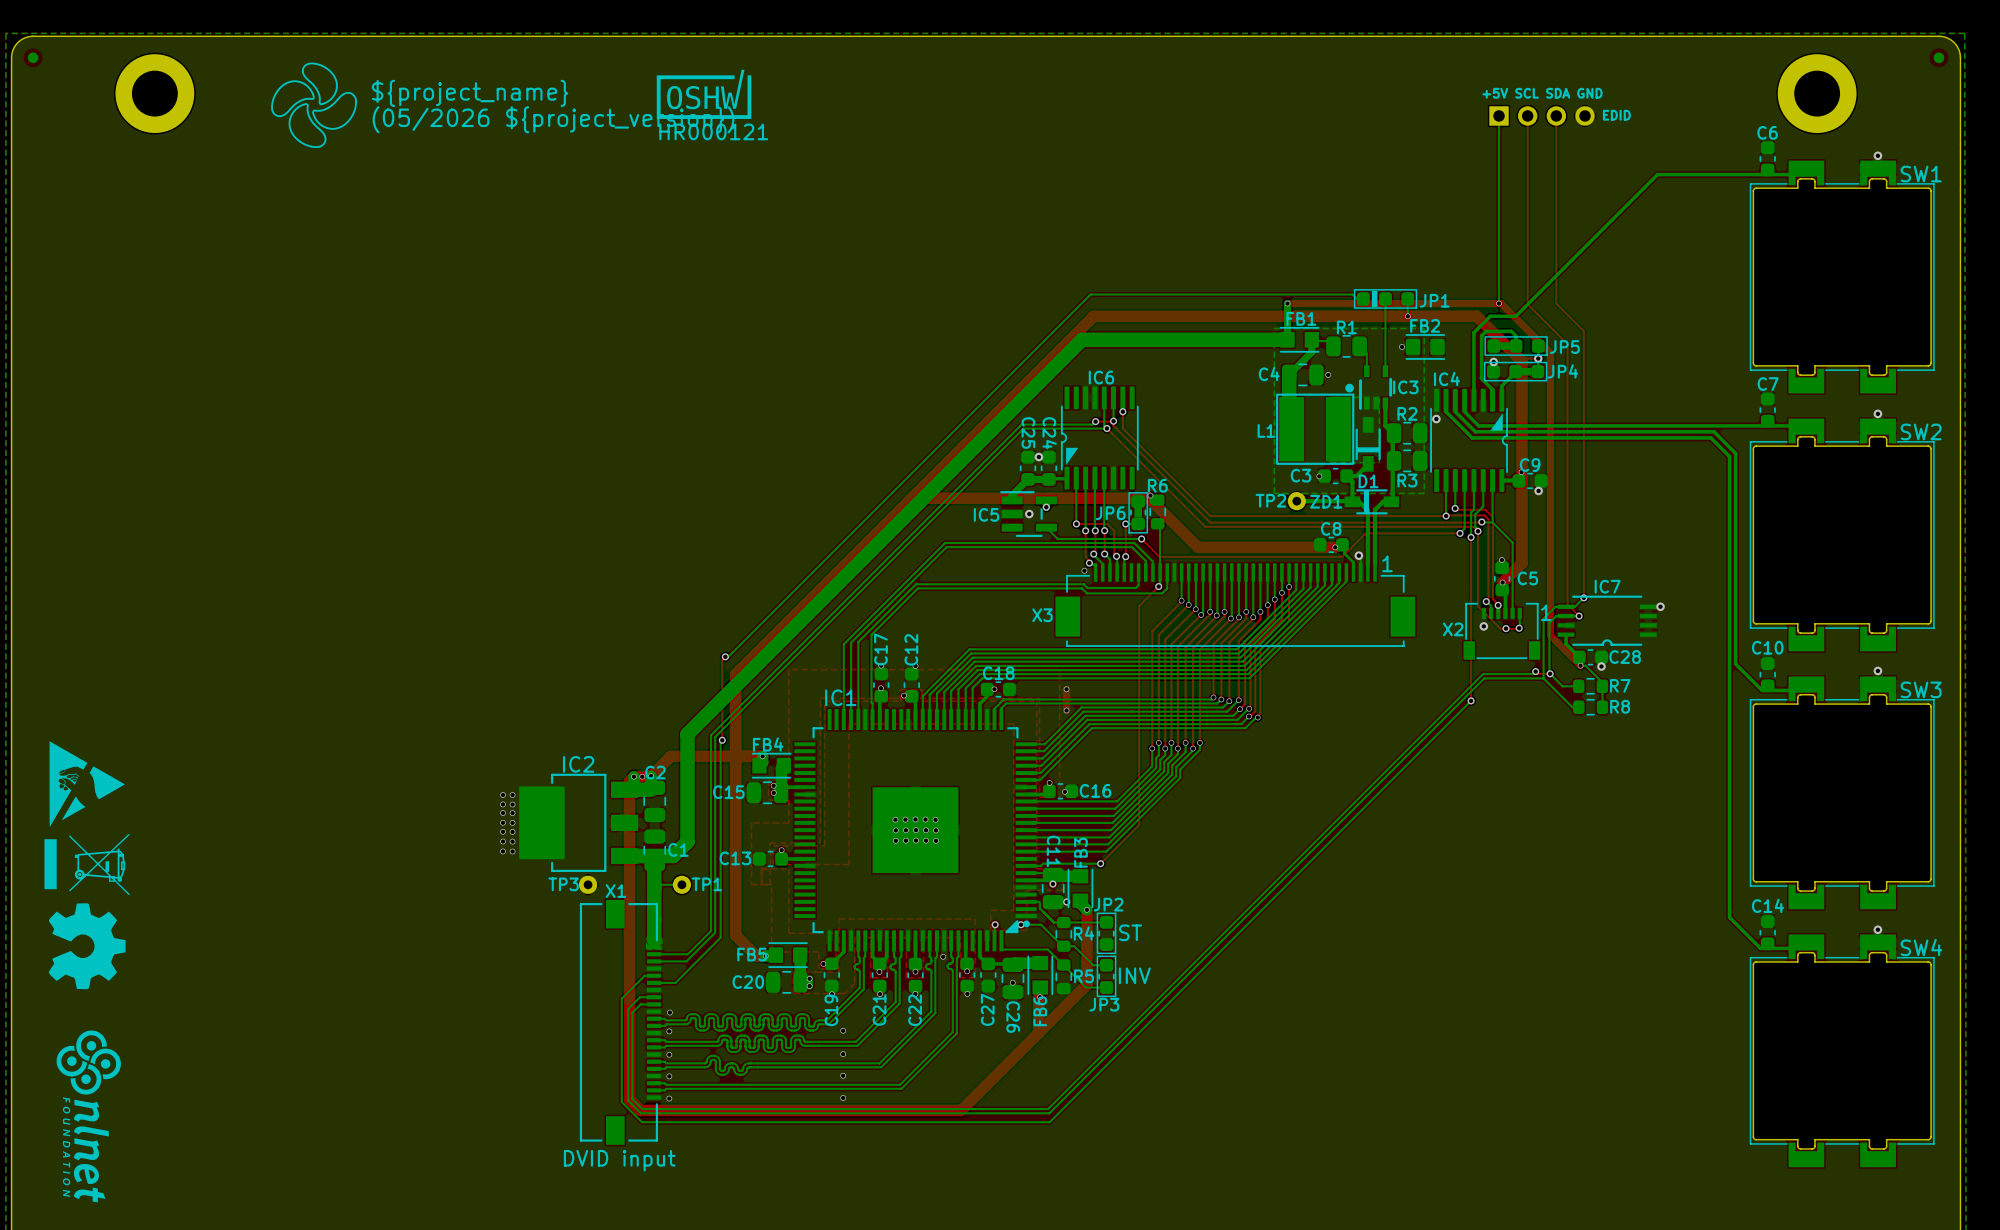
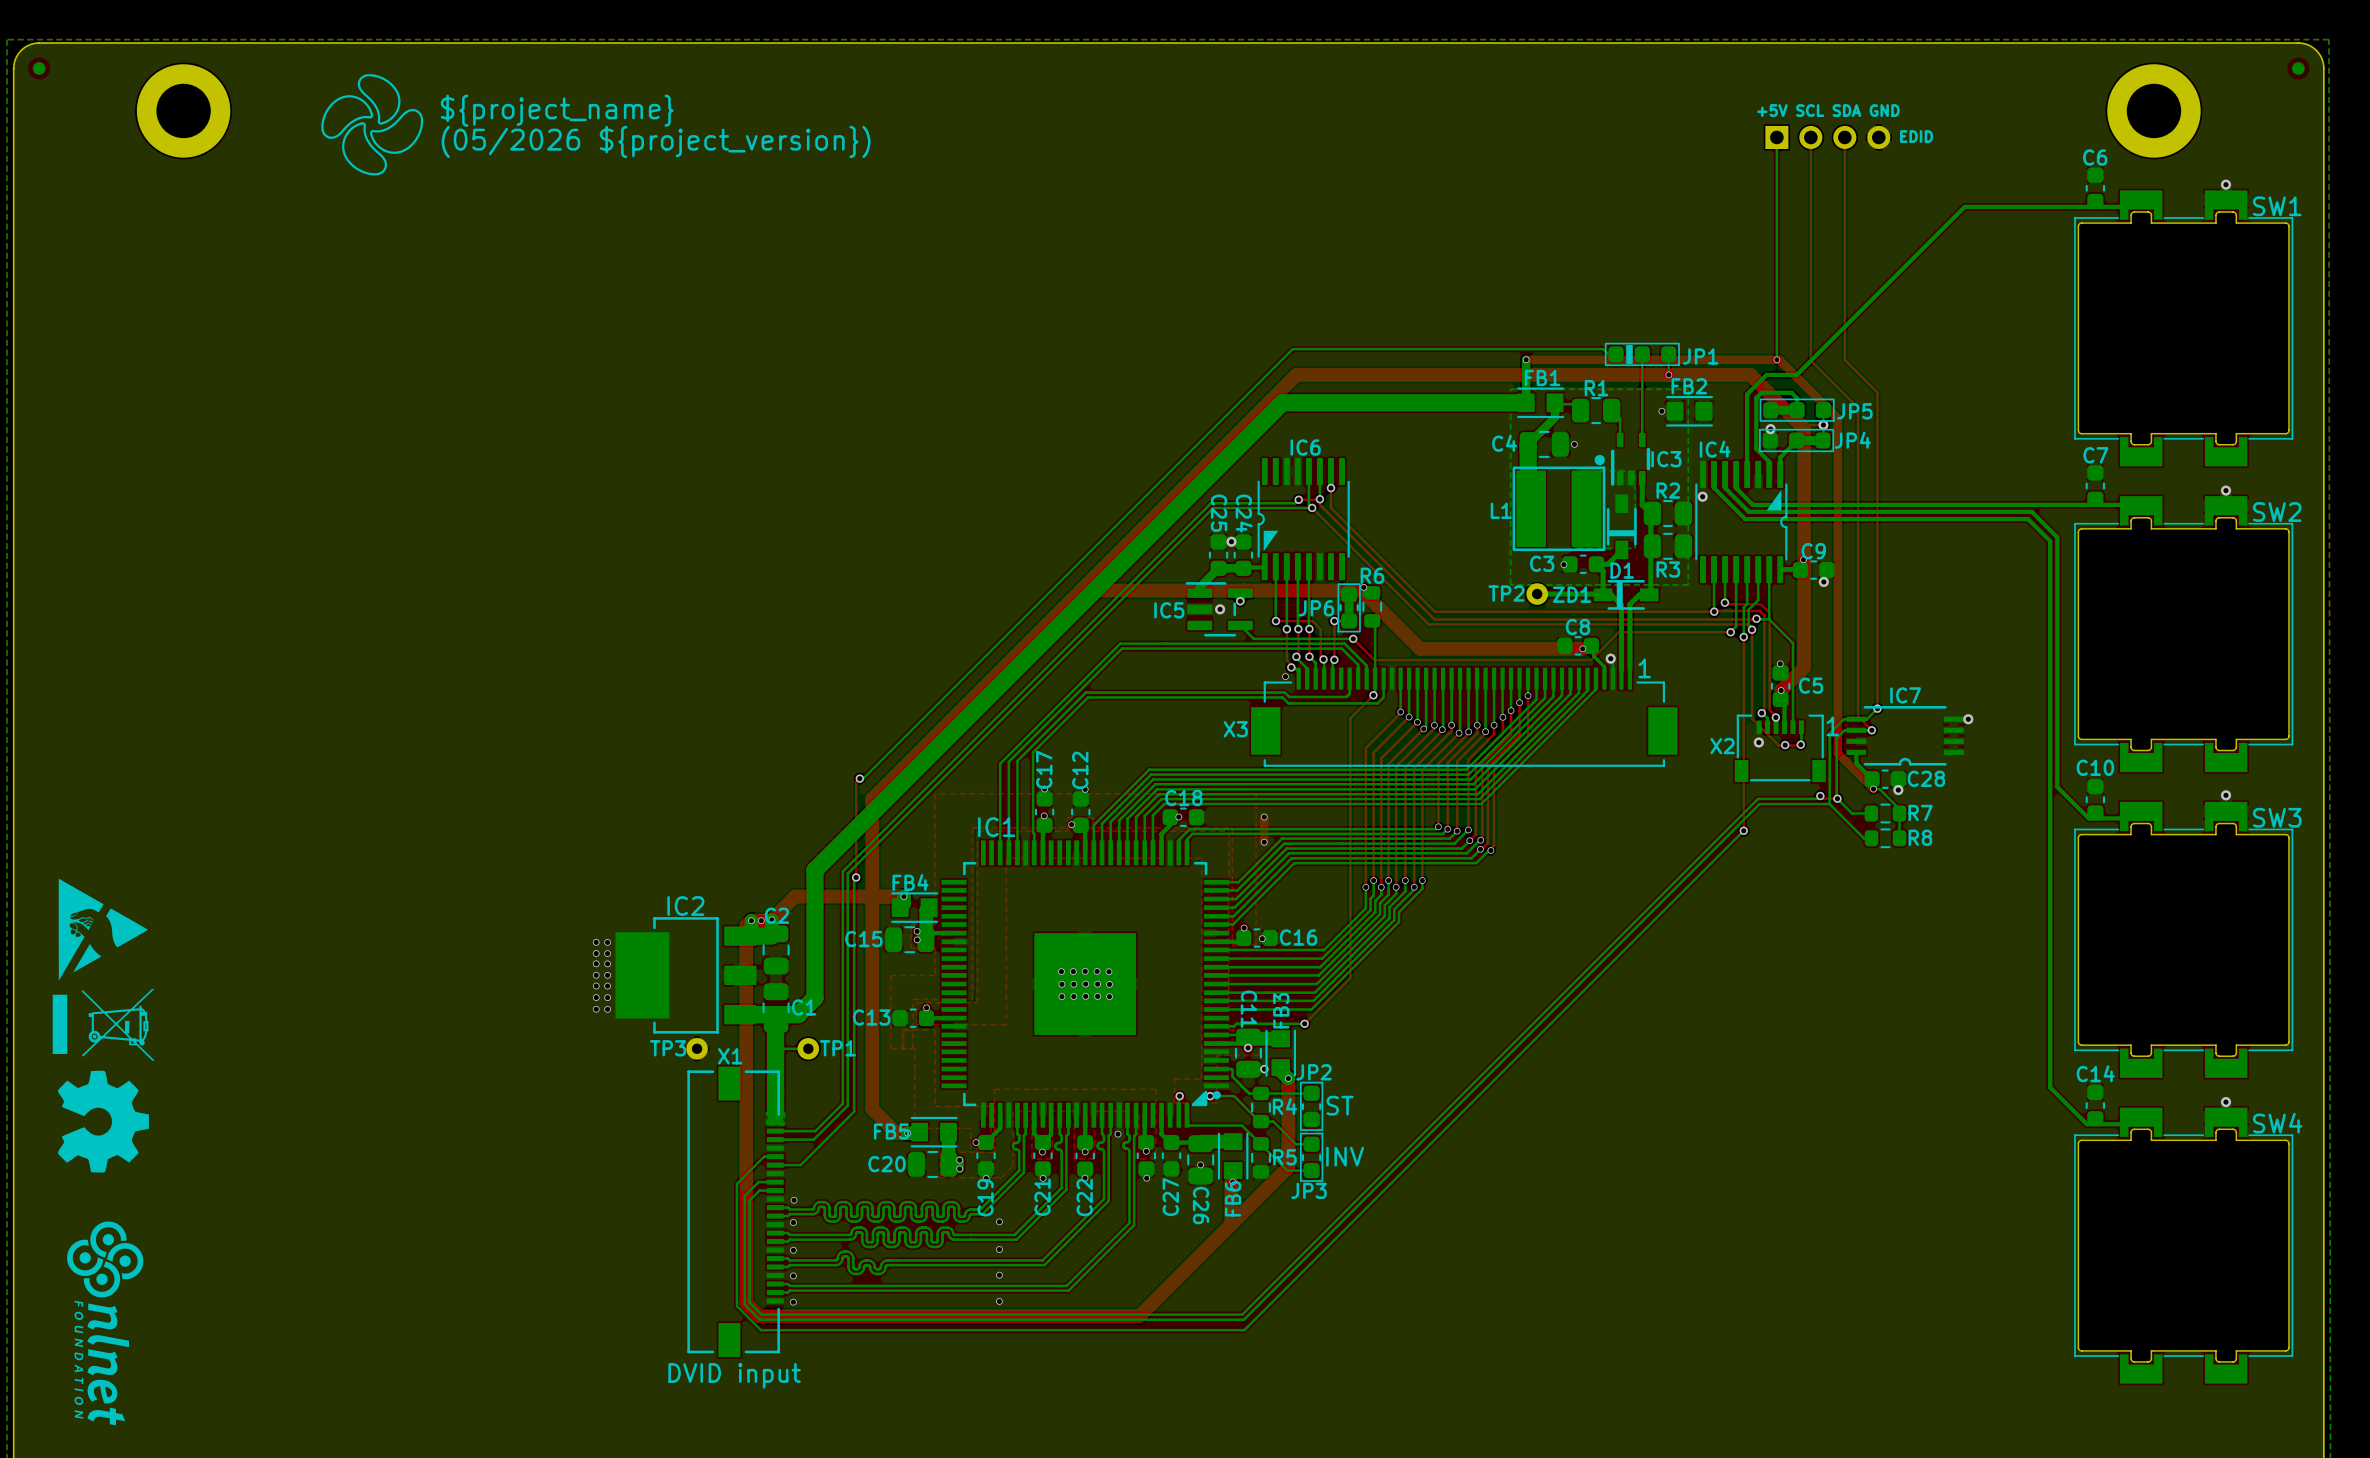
drawing: [656, 69, 752, 119] -> none
text: HR000121 (713, 131) -> none

